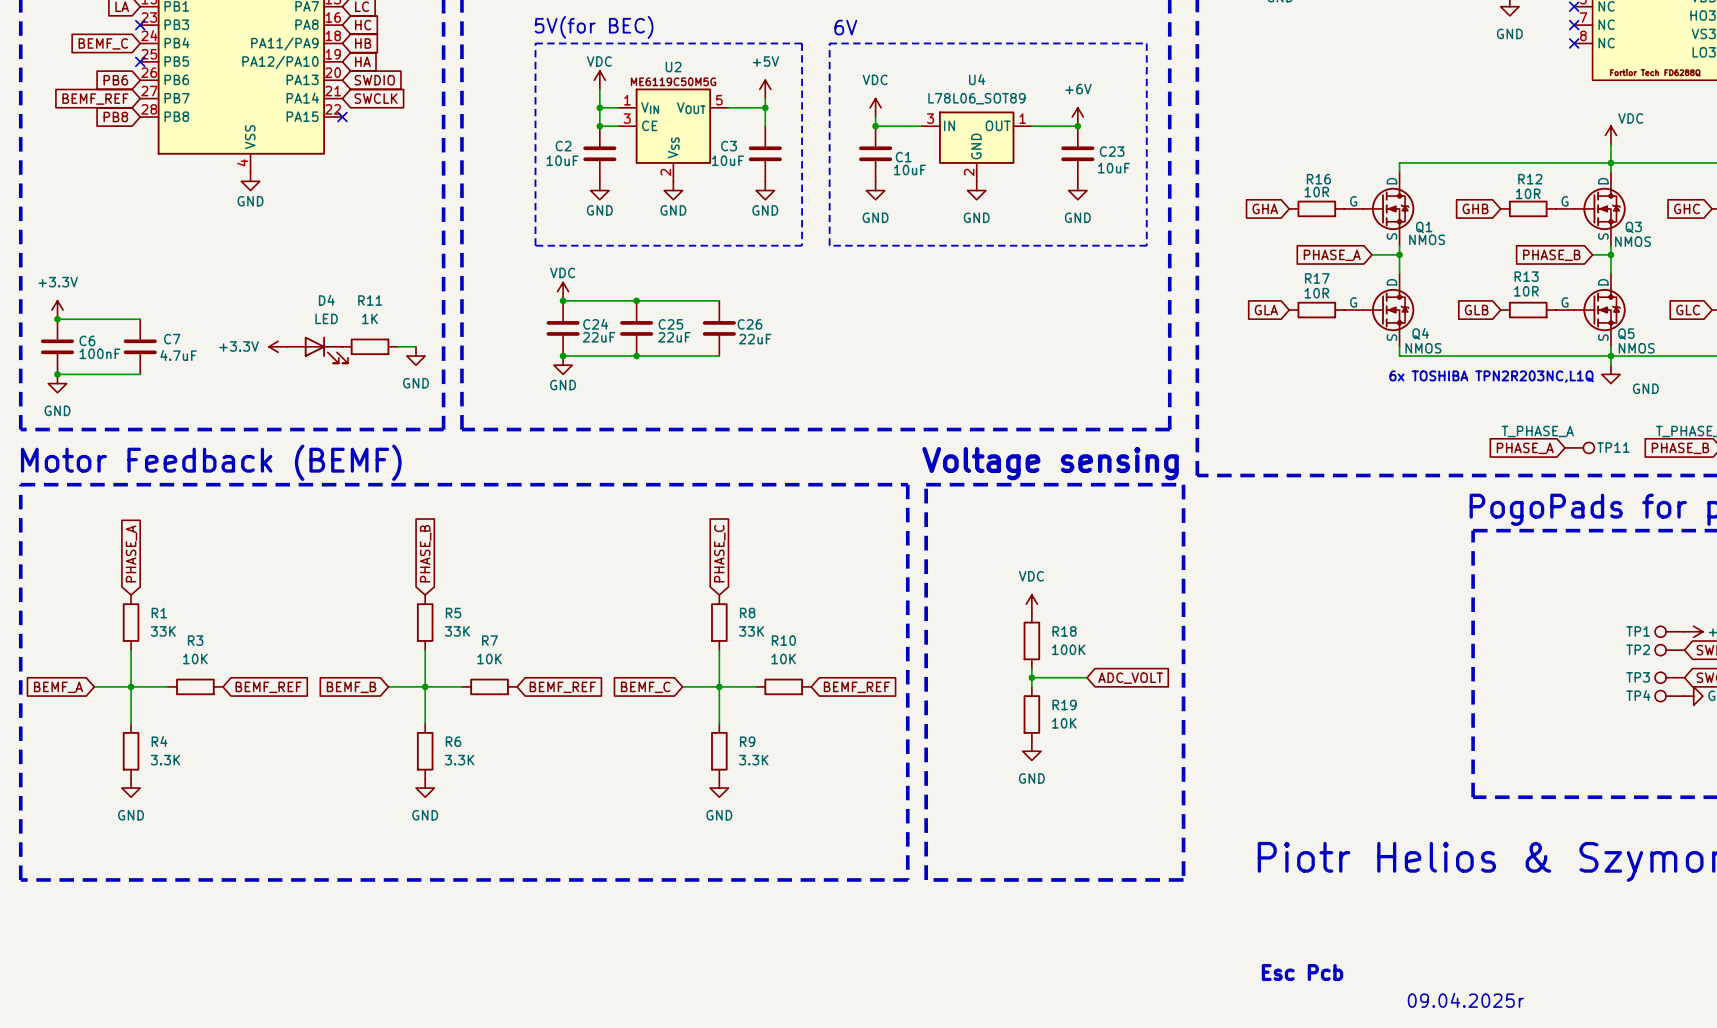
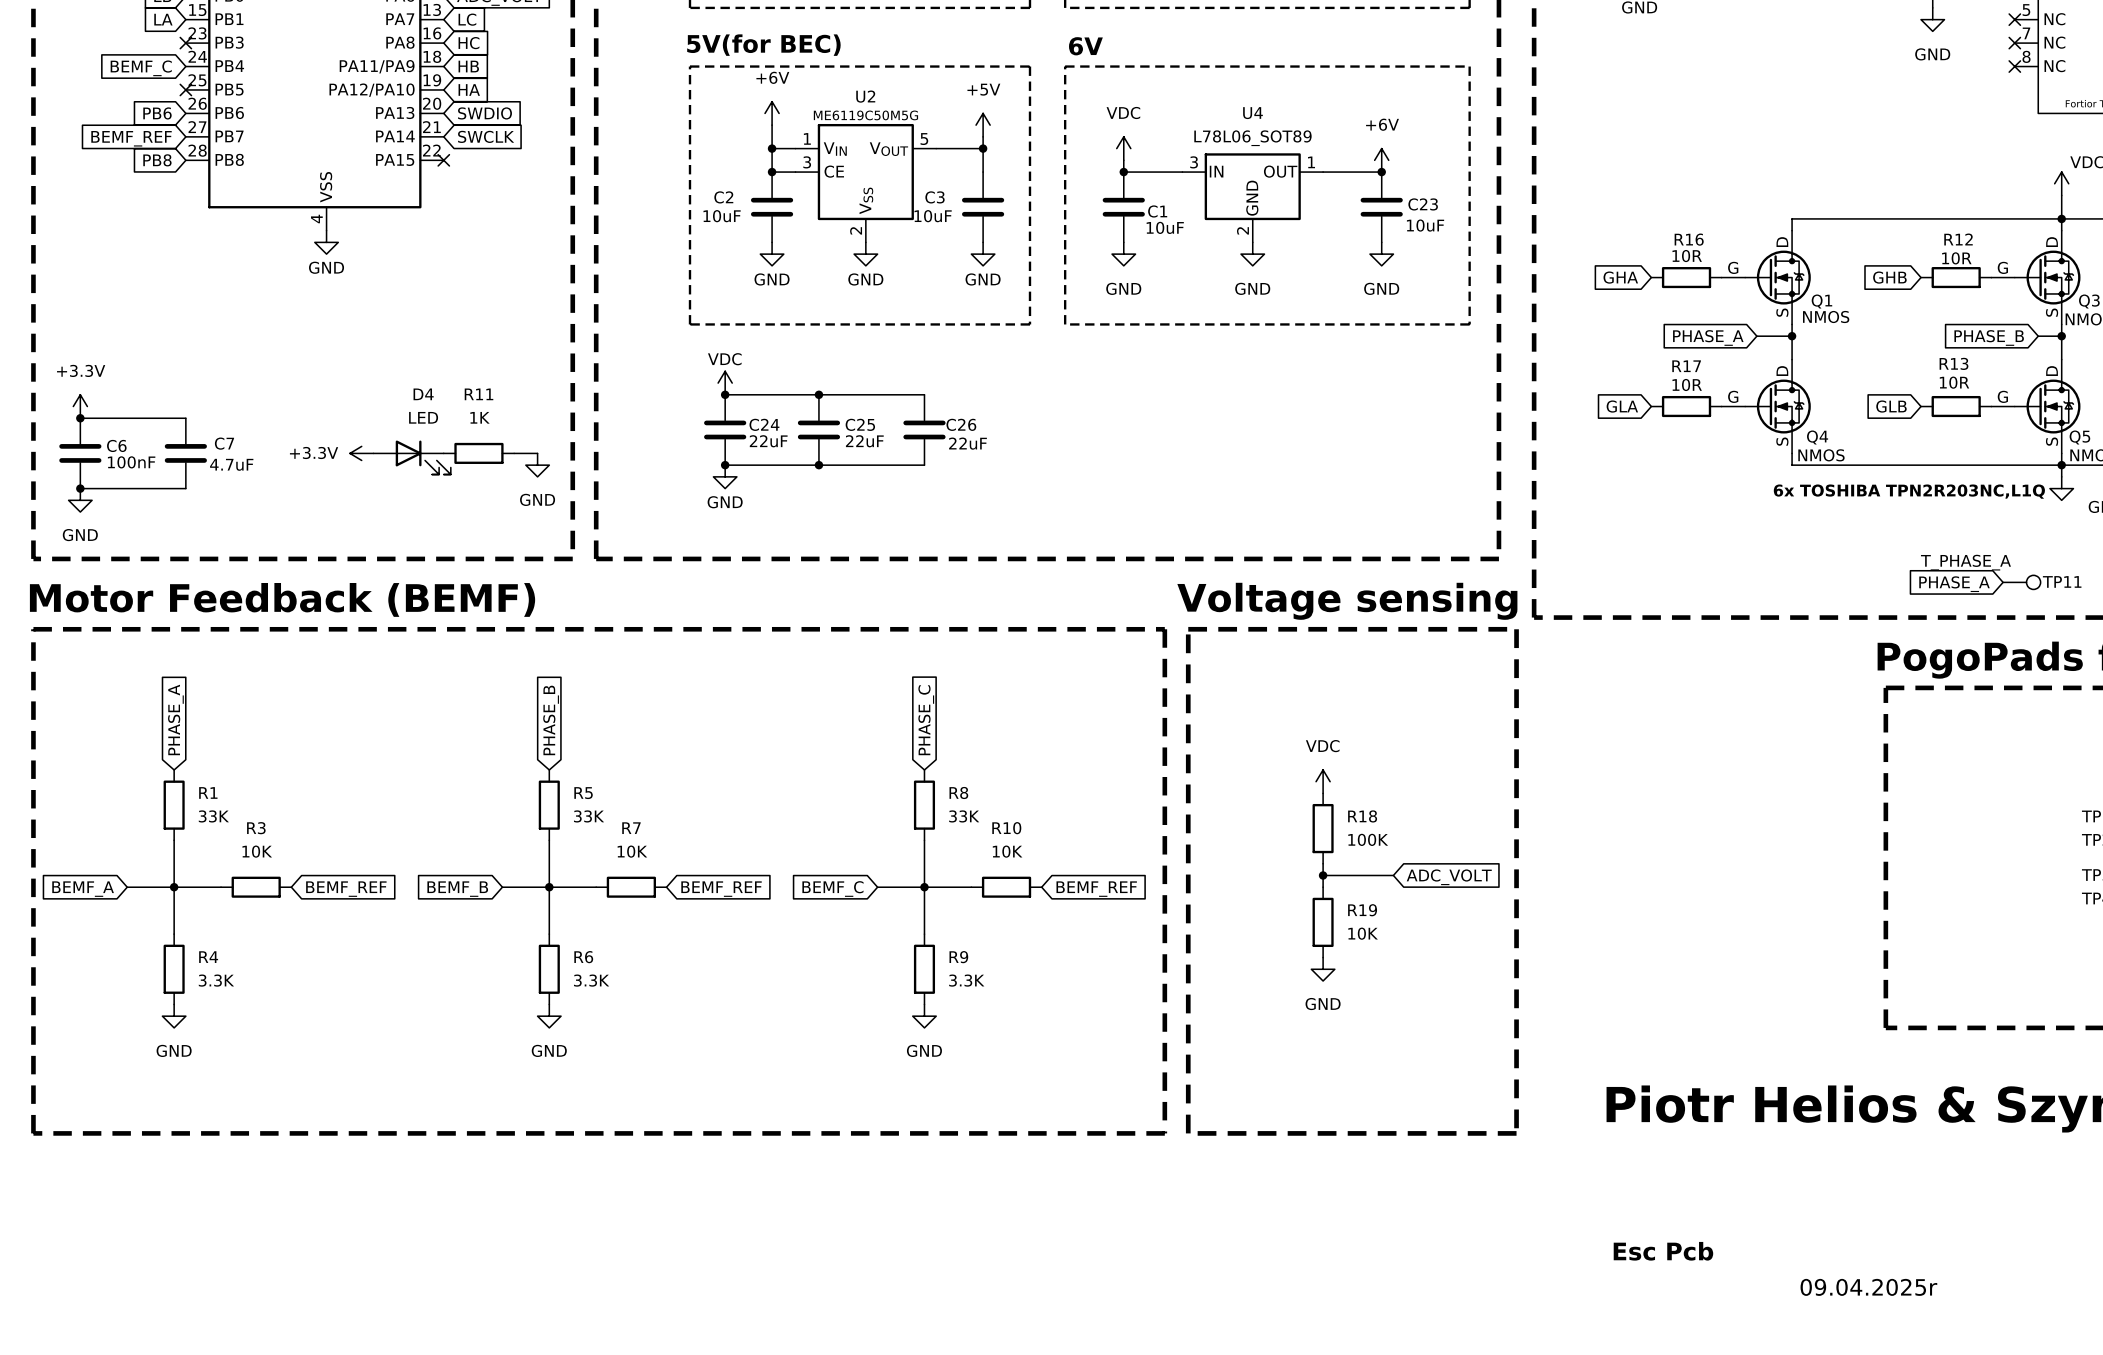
power symbol: VDC (599, 80) -> +6V (772, 113)

